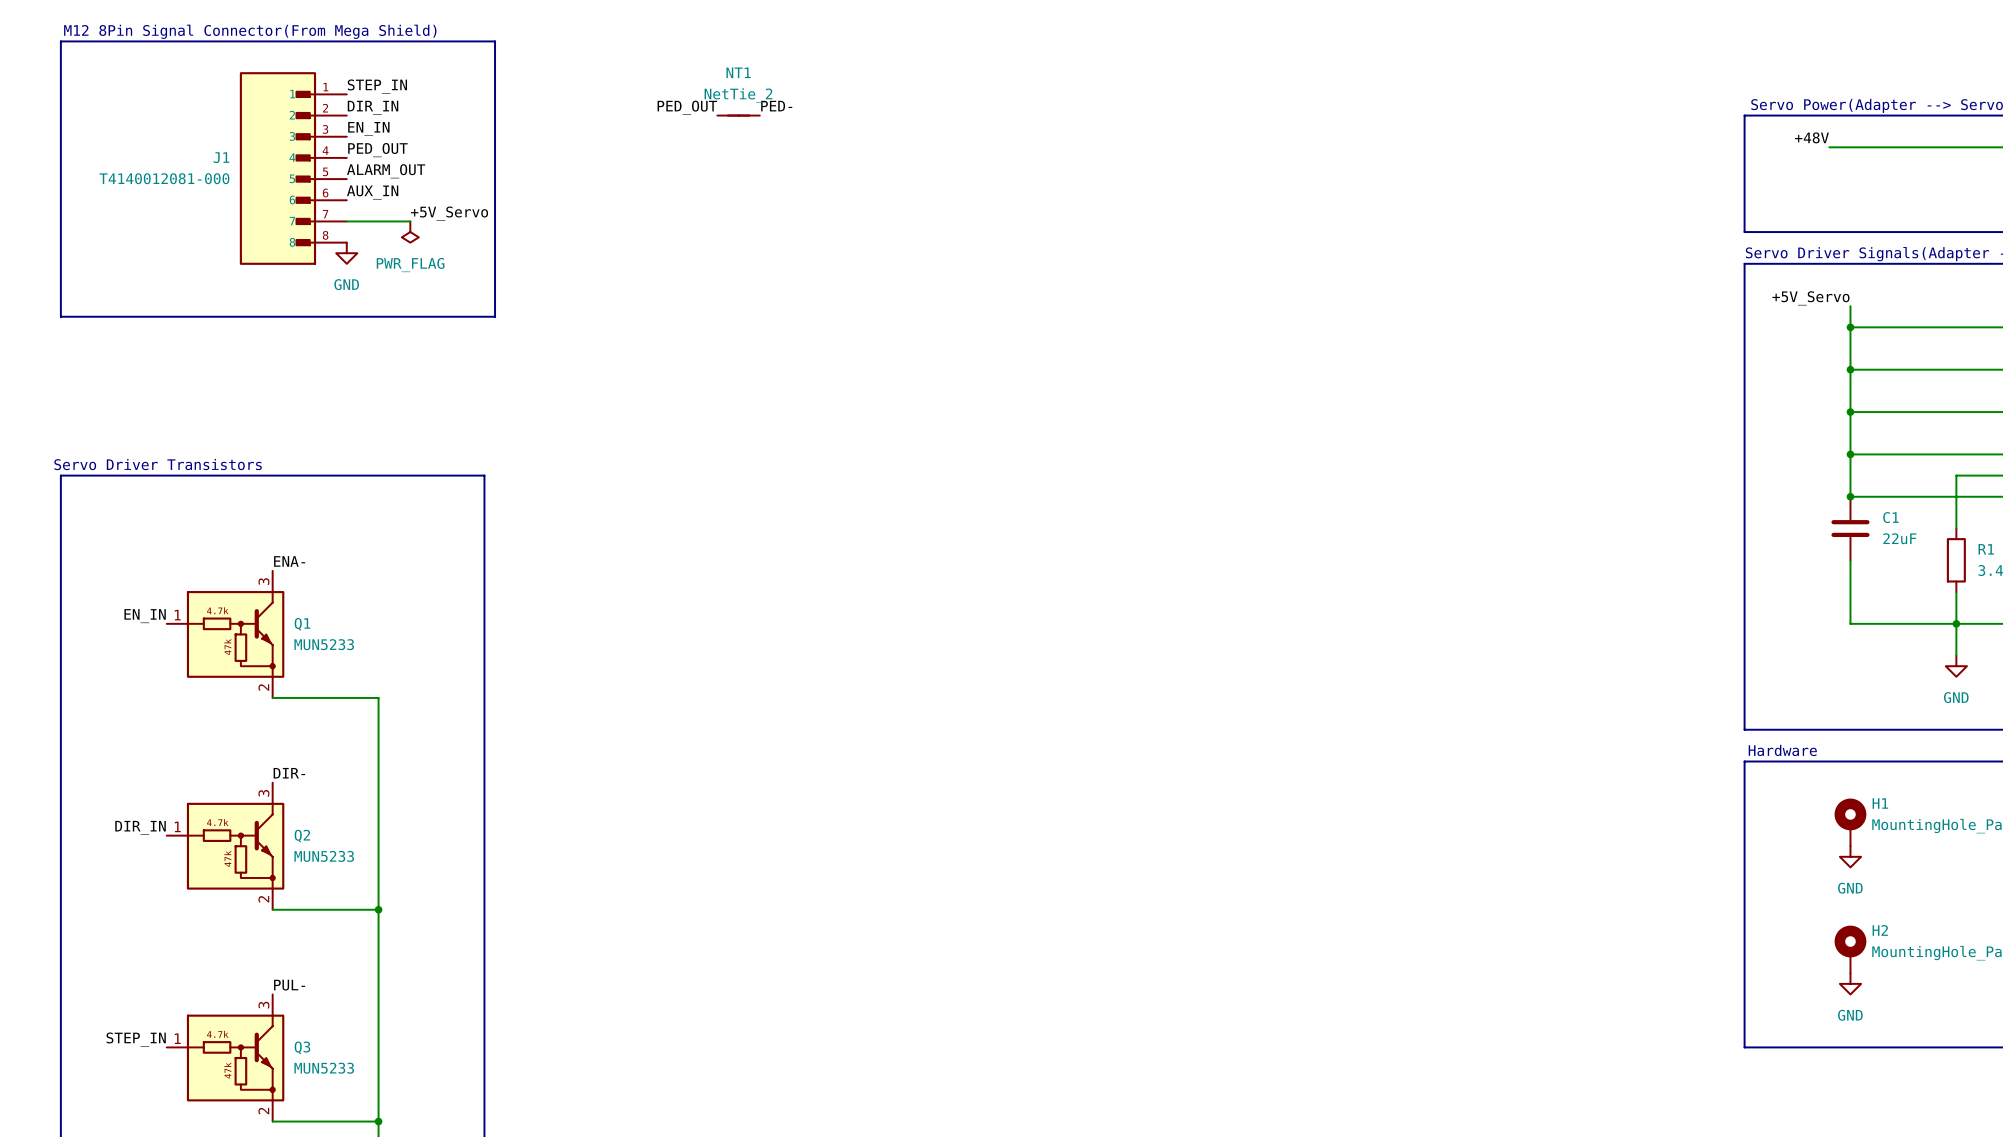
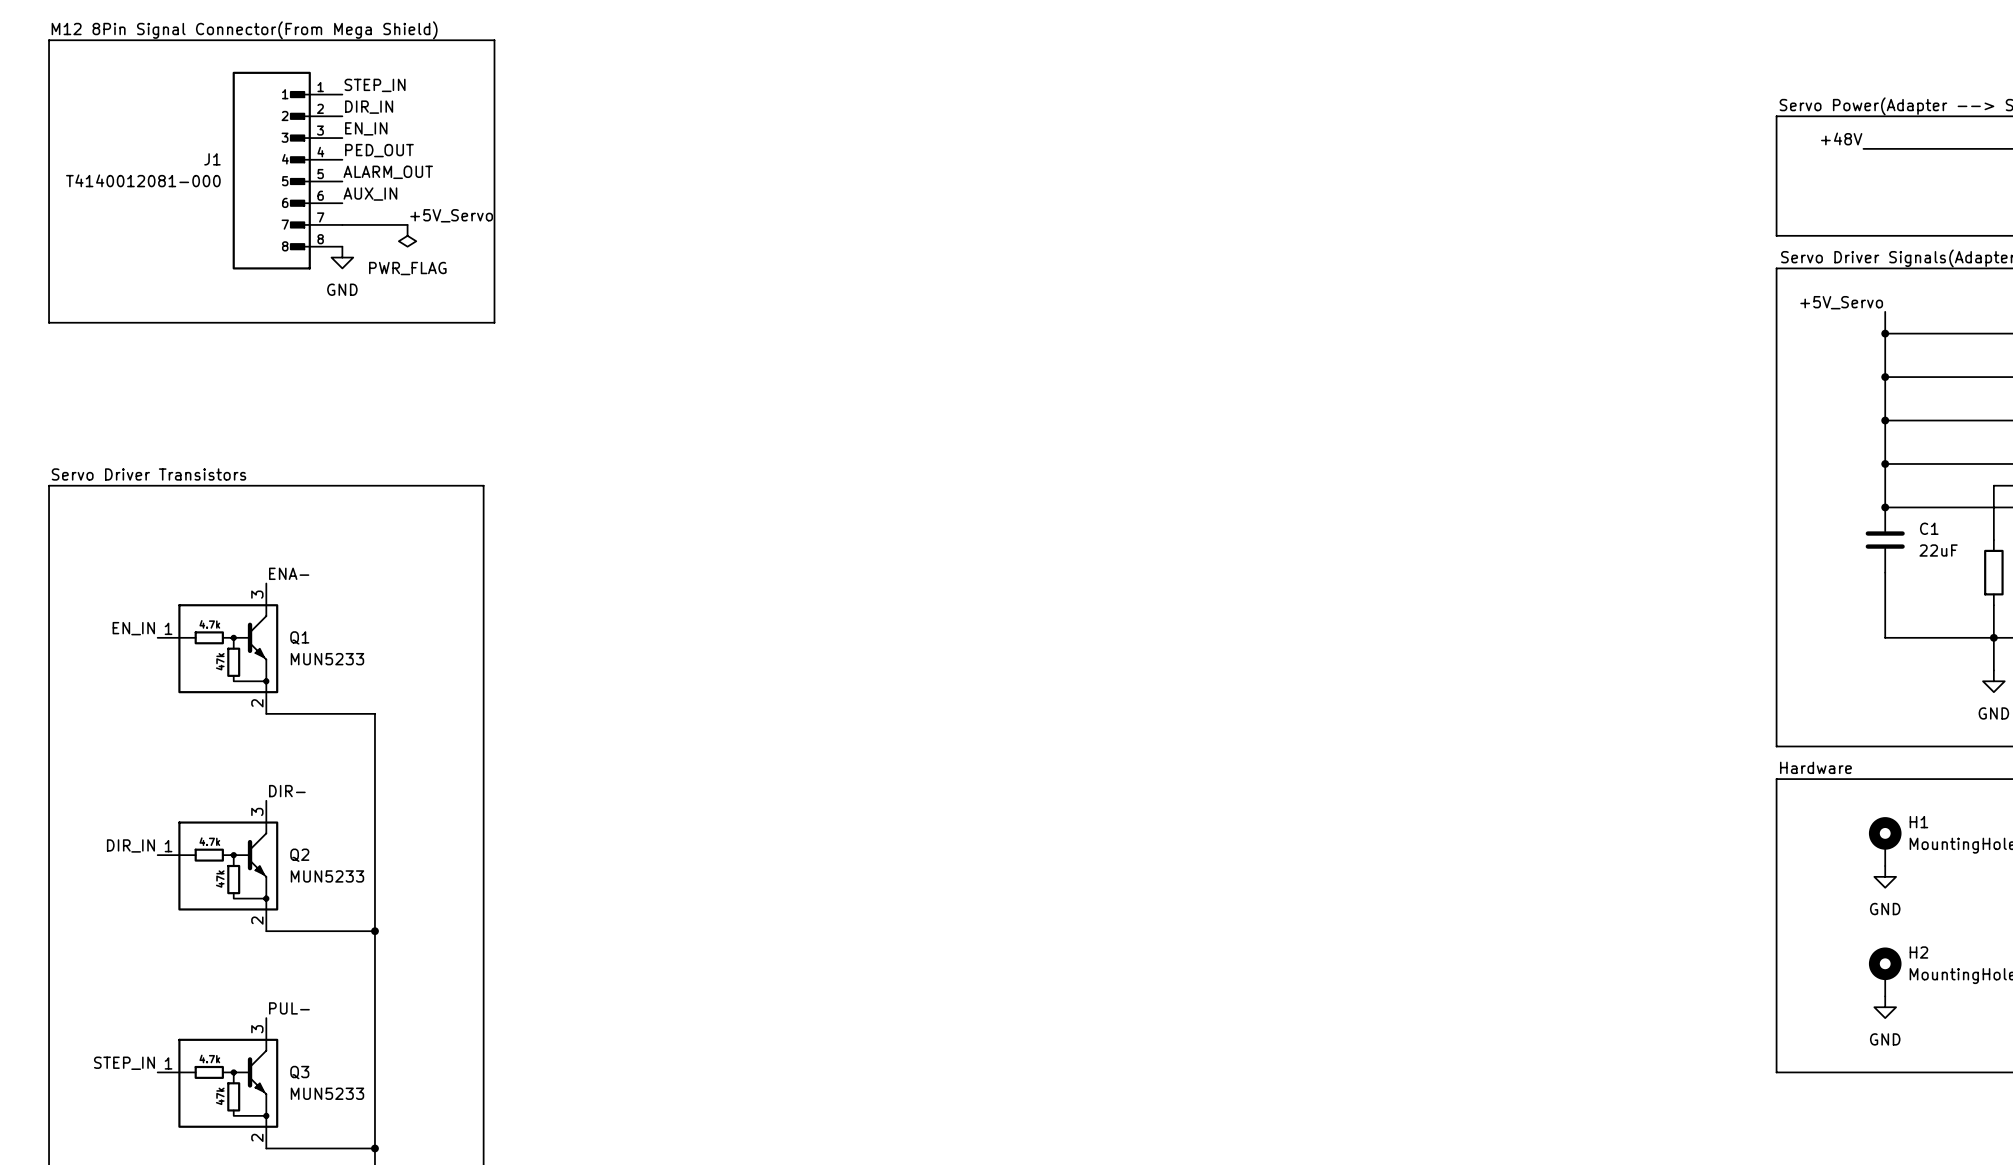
label: PED- (776, 106) -> none
label: PED_OUT (687, 107) -> none
NT1: NetTie_2 (738, 115) -> none

